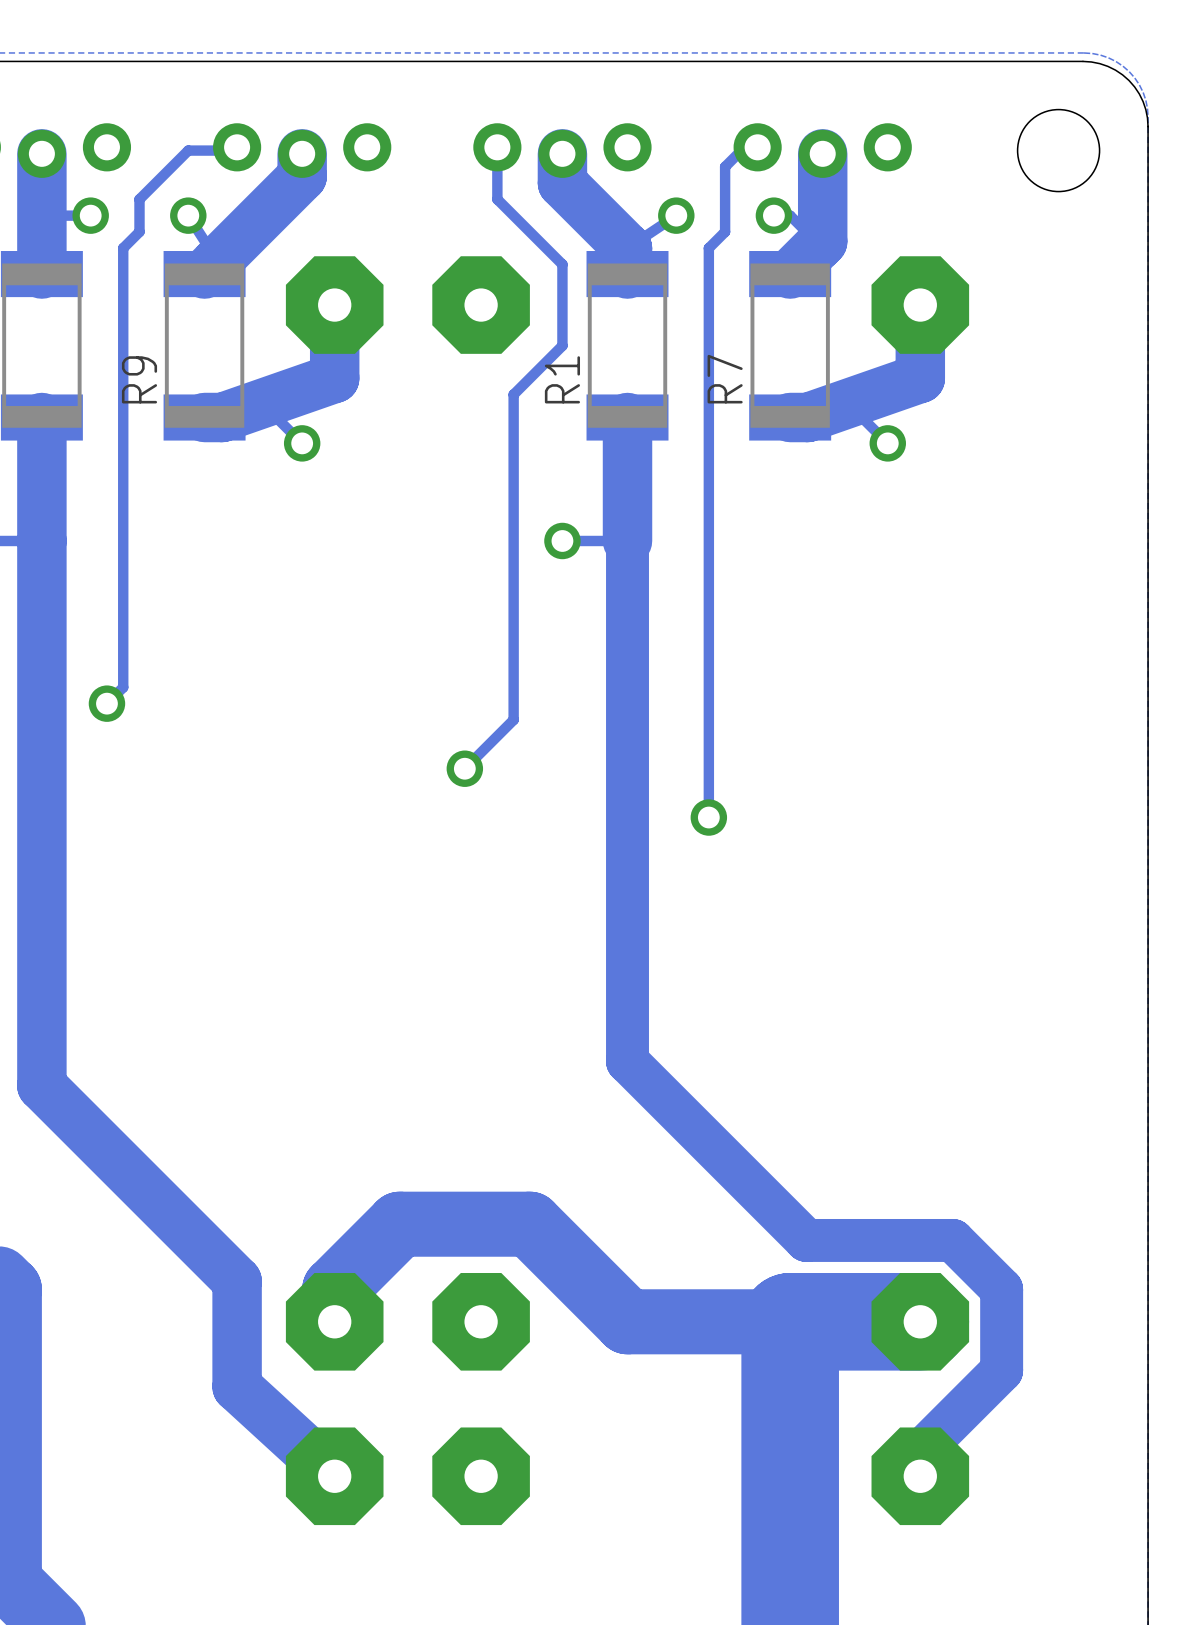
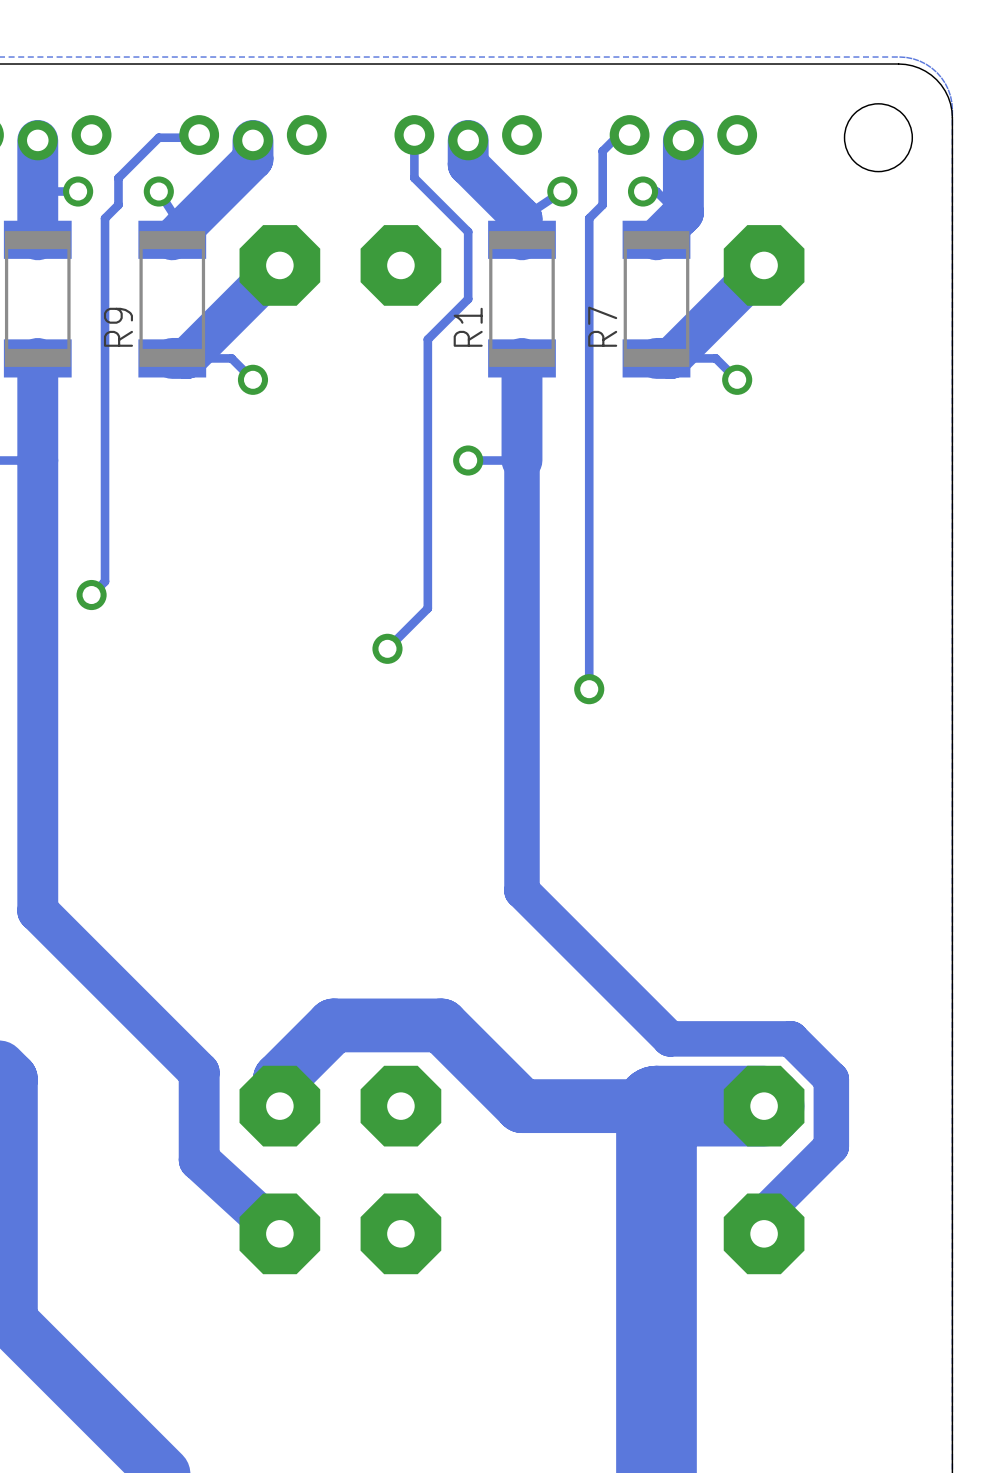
track: (334, 305) (334, 378) (222, 417) -> (279, 265) (186, 358)
track: (920, 305) (920, 378) (807, 417) -> (764, 265) (671, 358)

